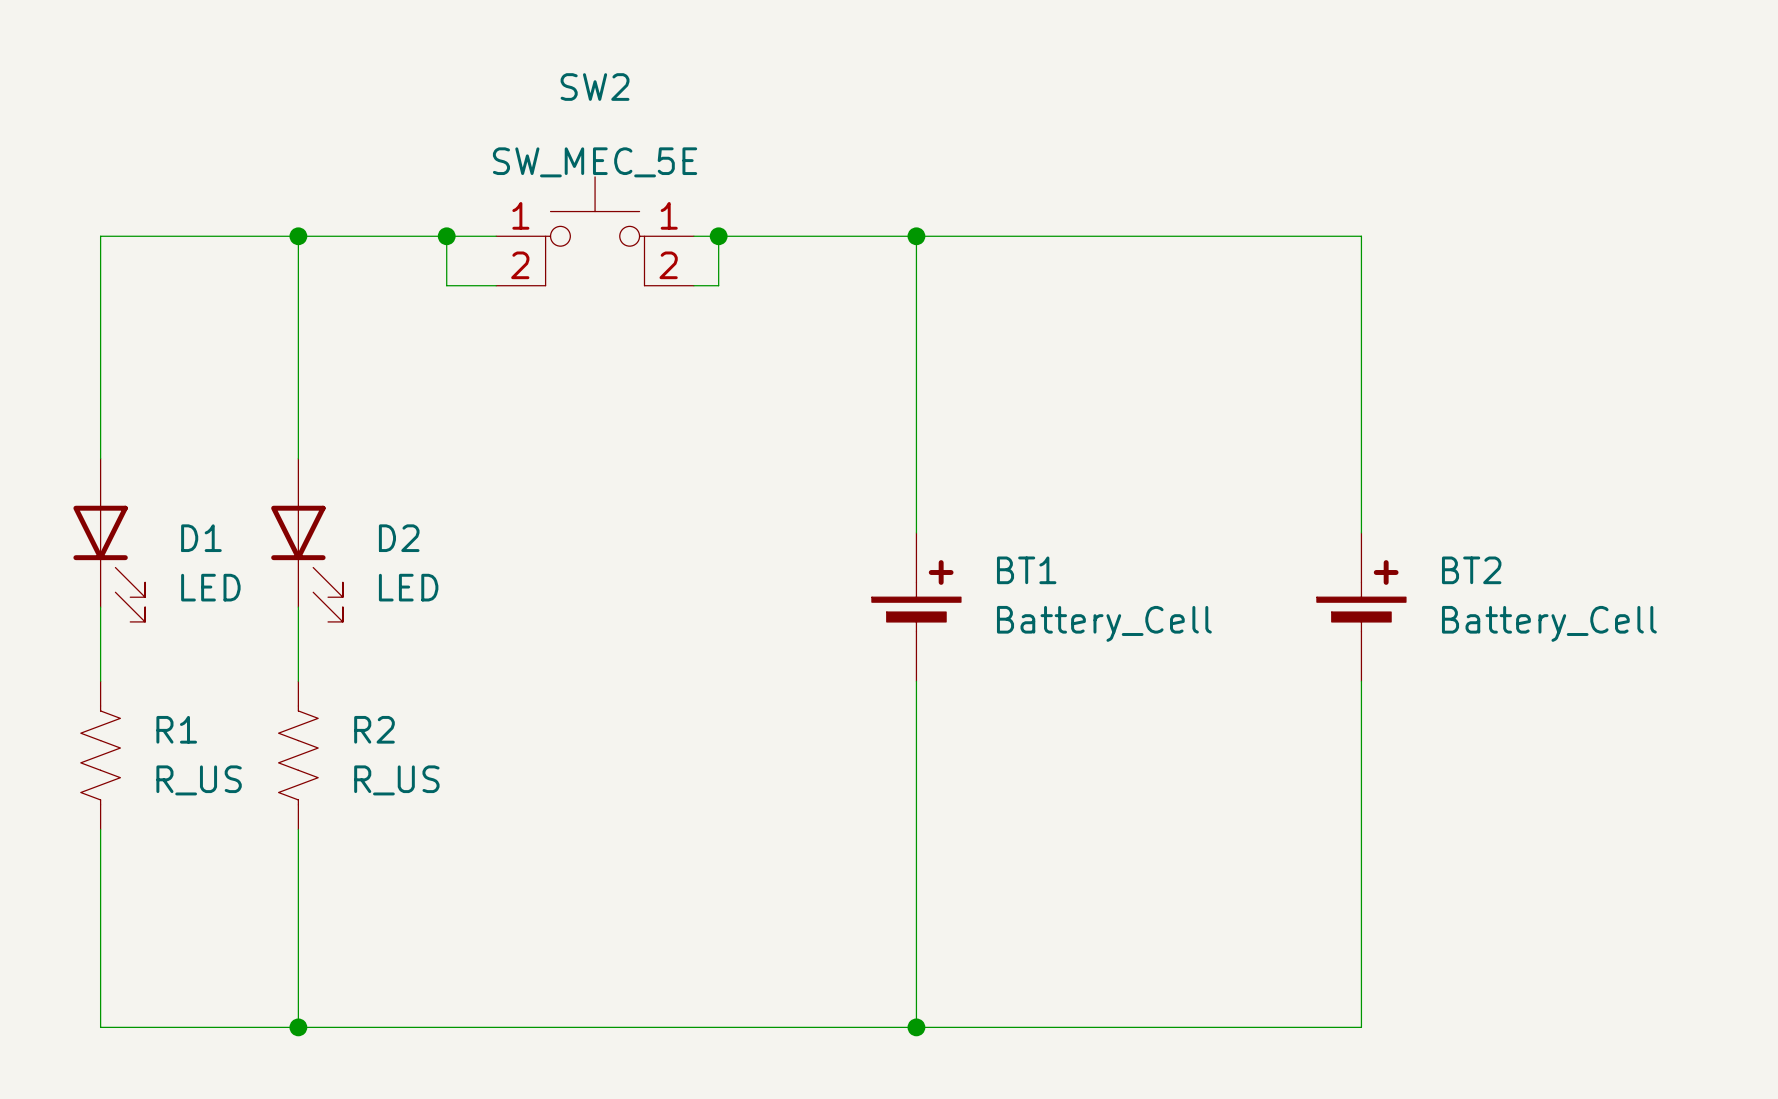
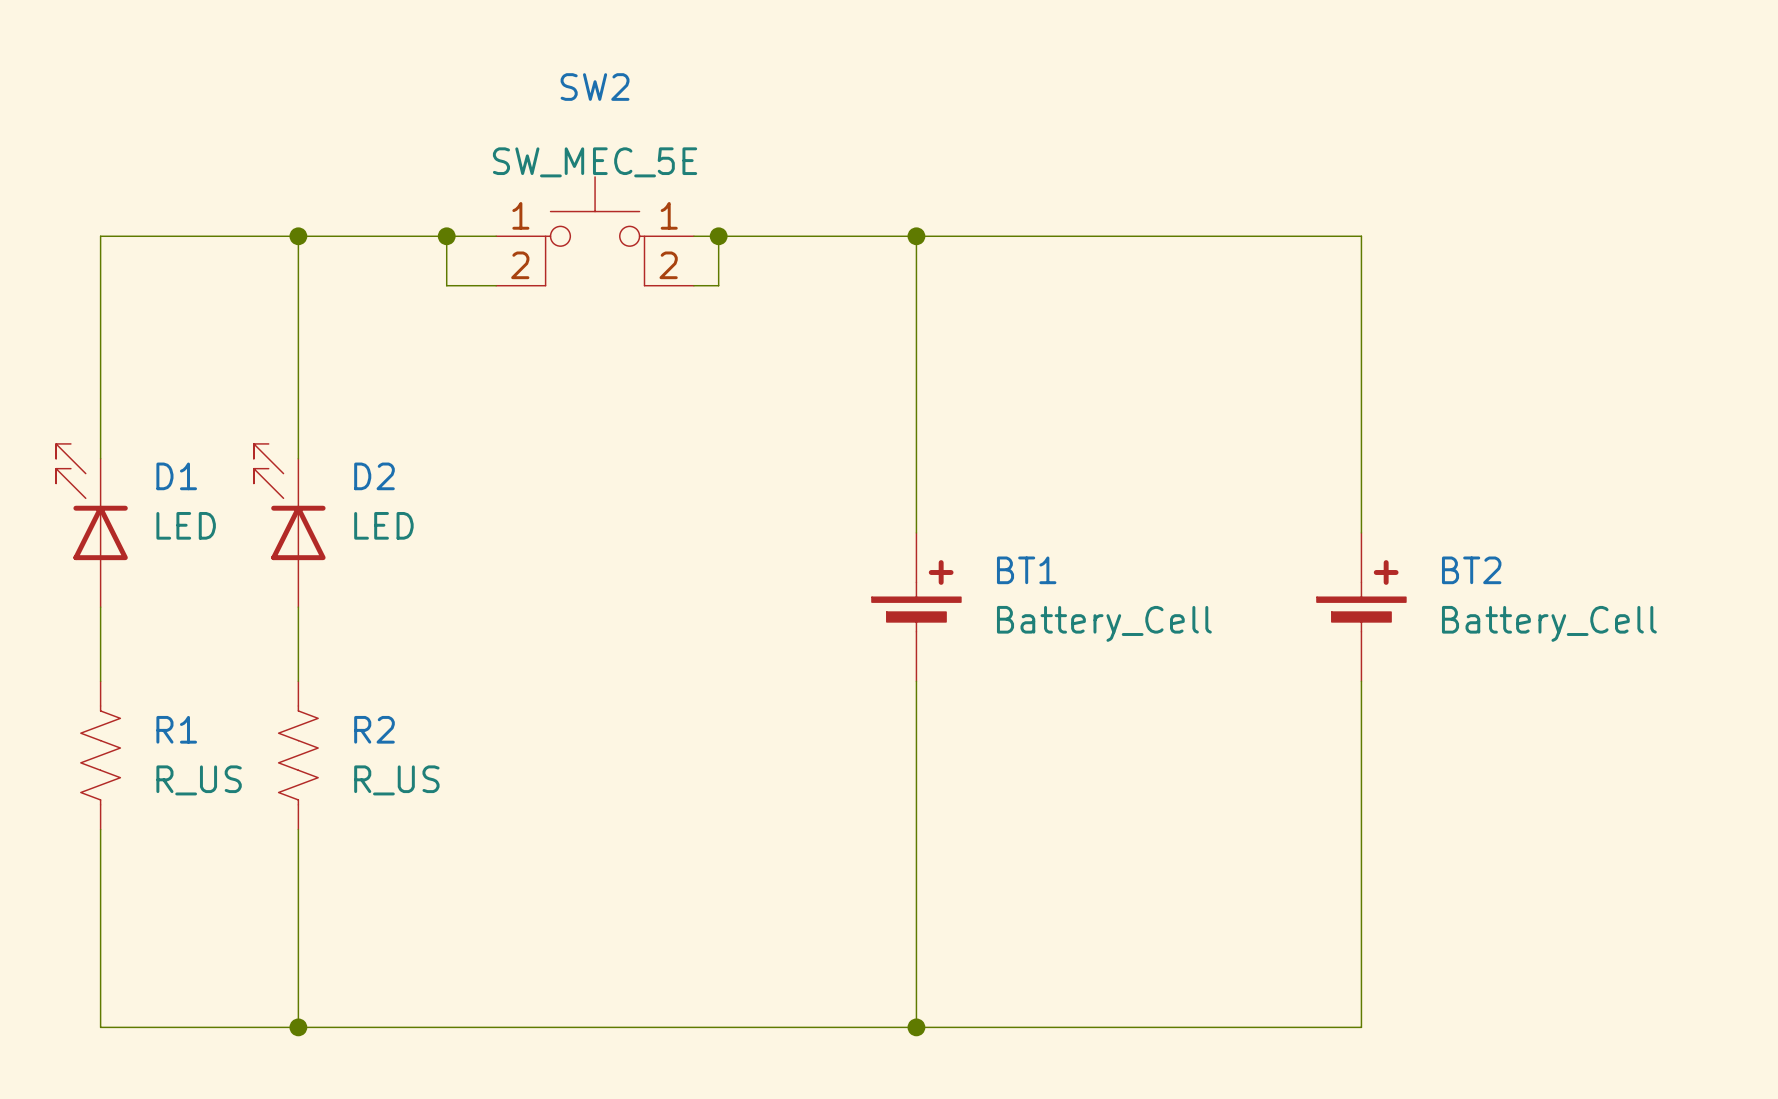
D1 name position: D1 (201, 538) -> D1 (176, 476)
D2 name position: D2 (399, 538) -> D2 (374, 476)
D1 rotation: 0° (109, 563) -> 180° (91, 502)
D2 rotation: 0° (307, 563) -> 180° (289, 502)
D1 value position: LED (210, 587) -> LED (186, 525)
D2 value position: LED (408, 587) -> LED (383, 525)

